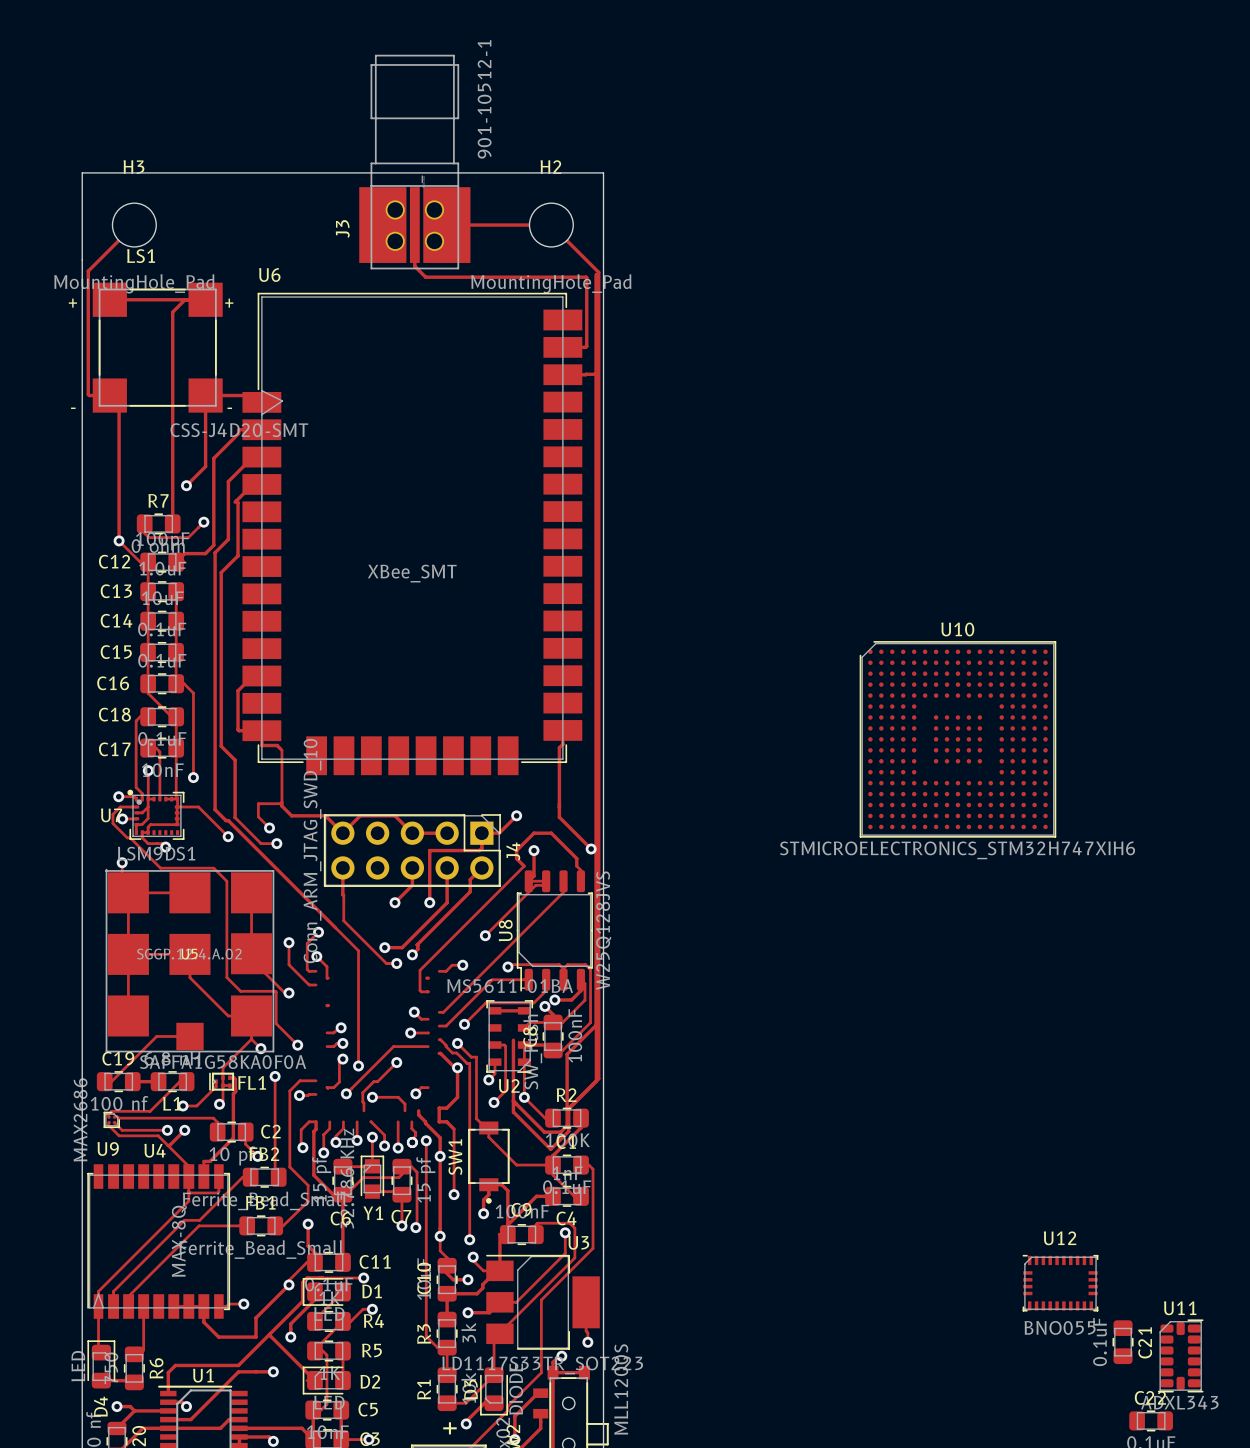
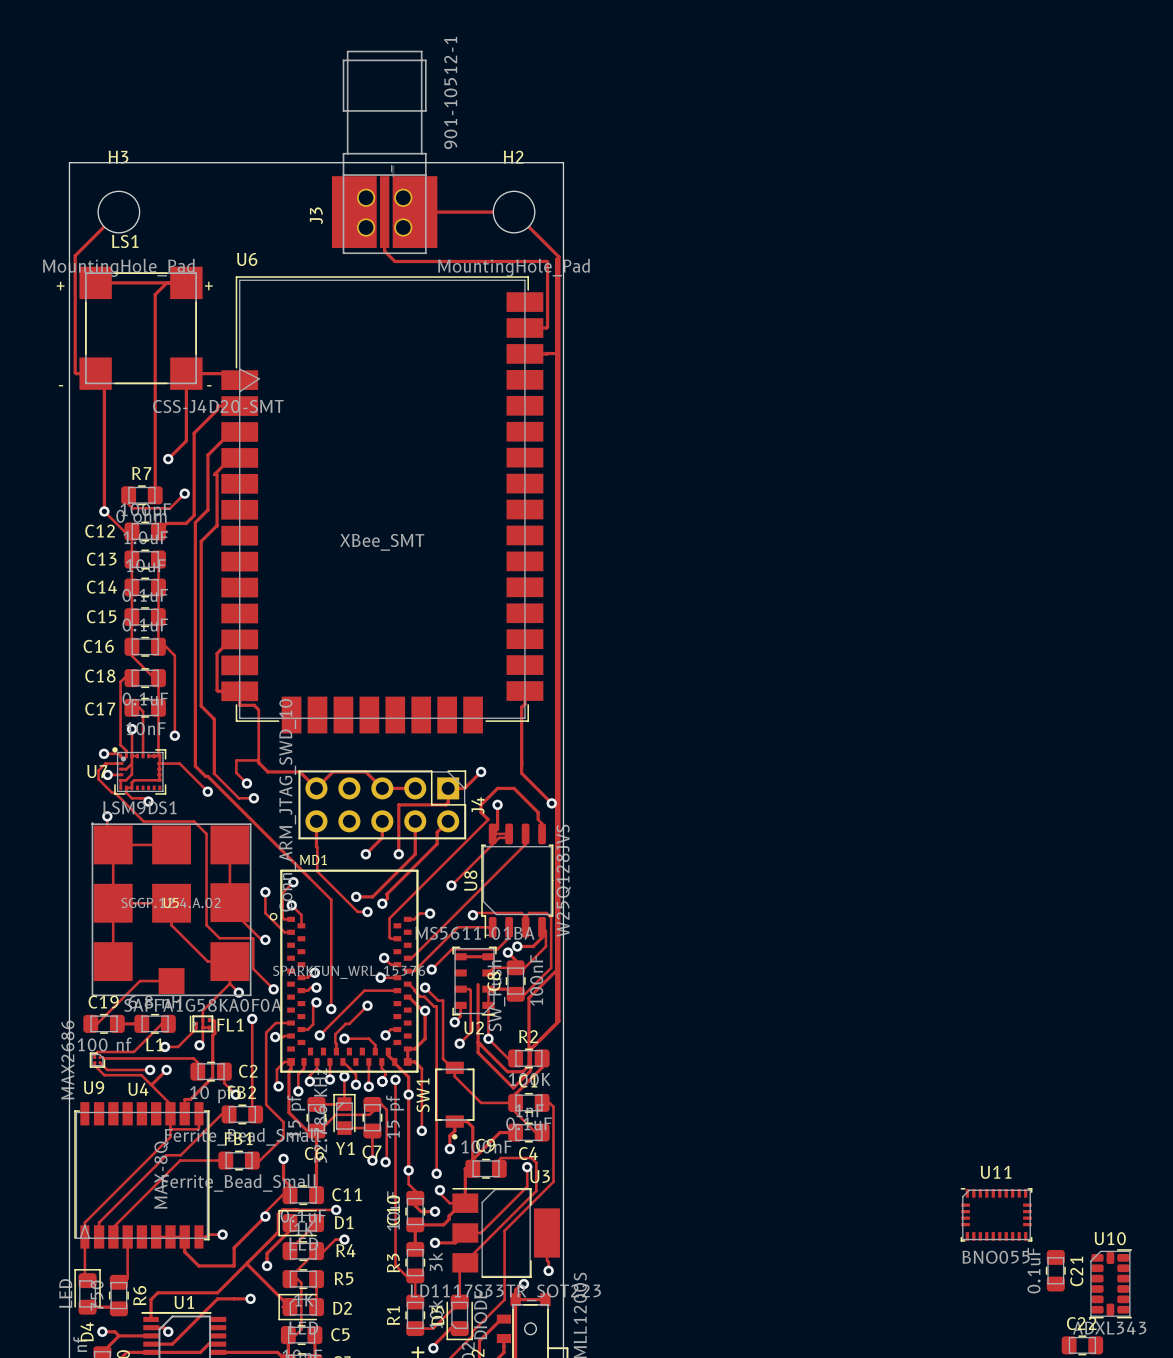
U10: STMICROELECTRONICS_STM32H747XIH6 (957, 739) -> none
MD1: none -> SPARKFUN_WRL-15376 (344, 971)
U12 name: U12 (1060, 1238) -> U11 (996, 1172)
U11 name: U11 (1180, 1308) -> U10 (1110, 1238)

